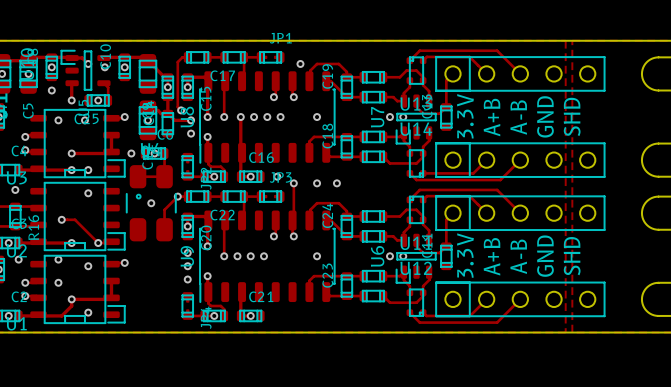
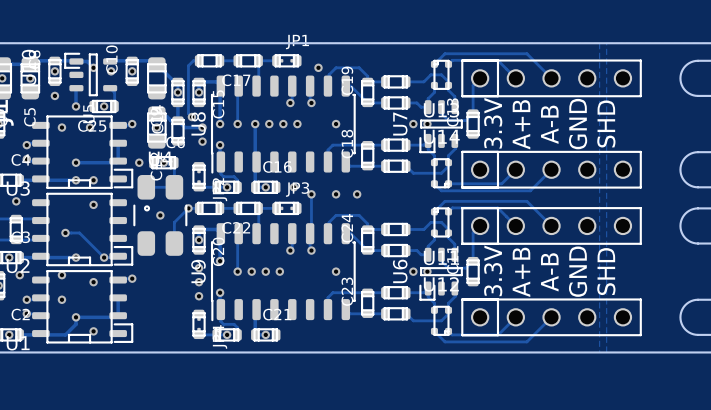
R16 name: R16 (33, 227) -> none

